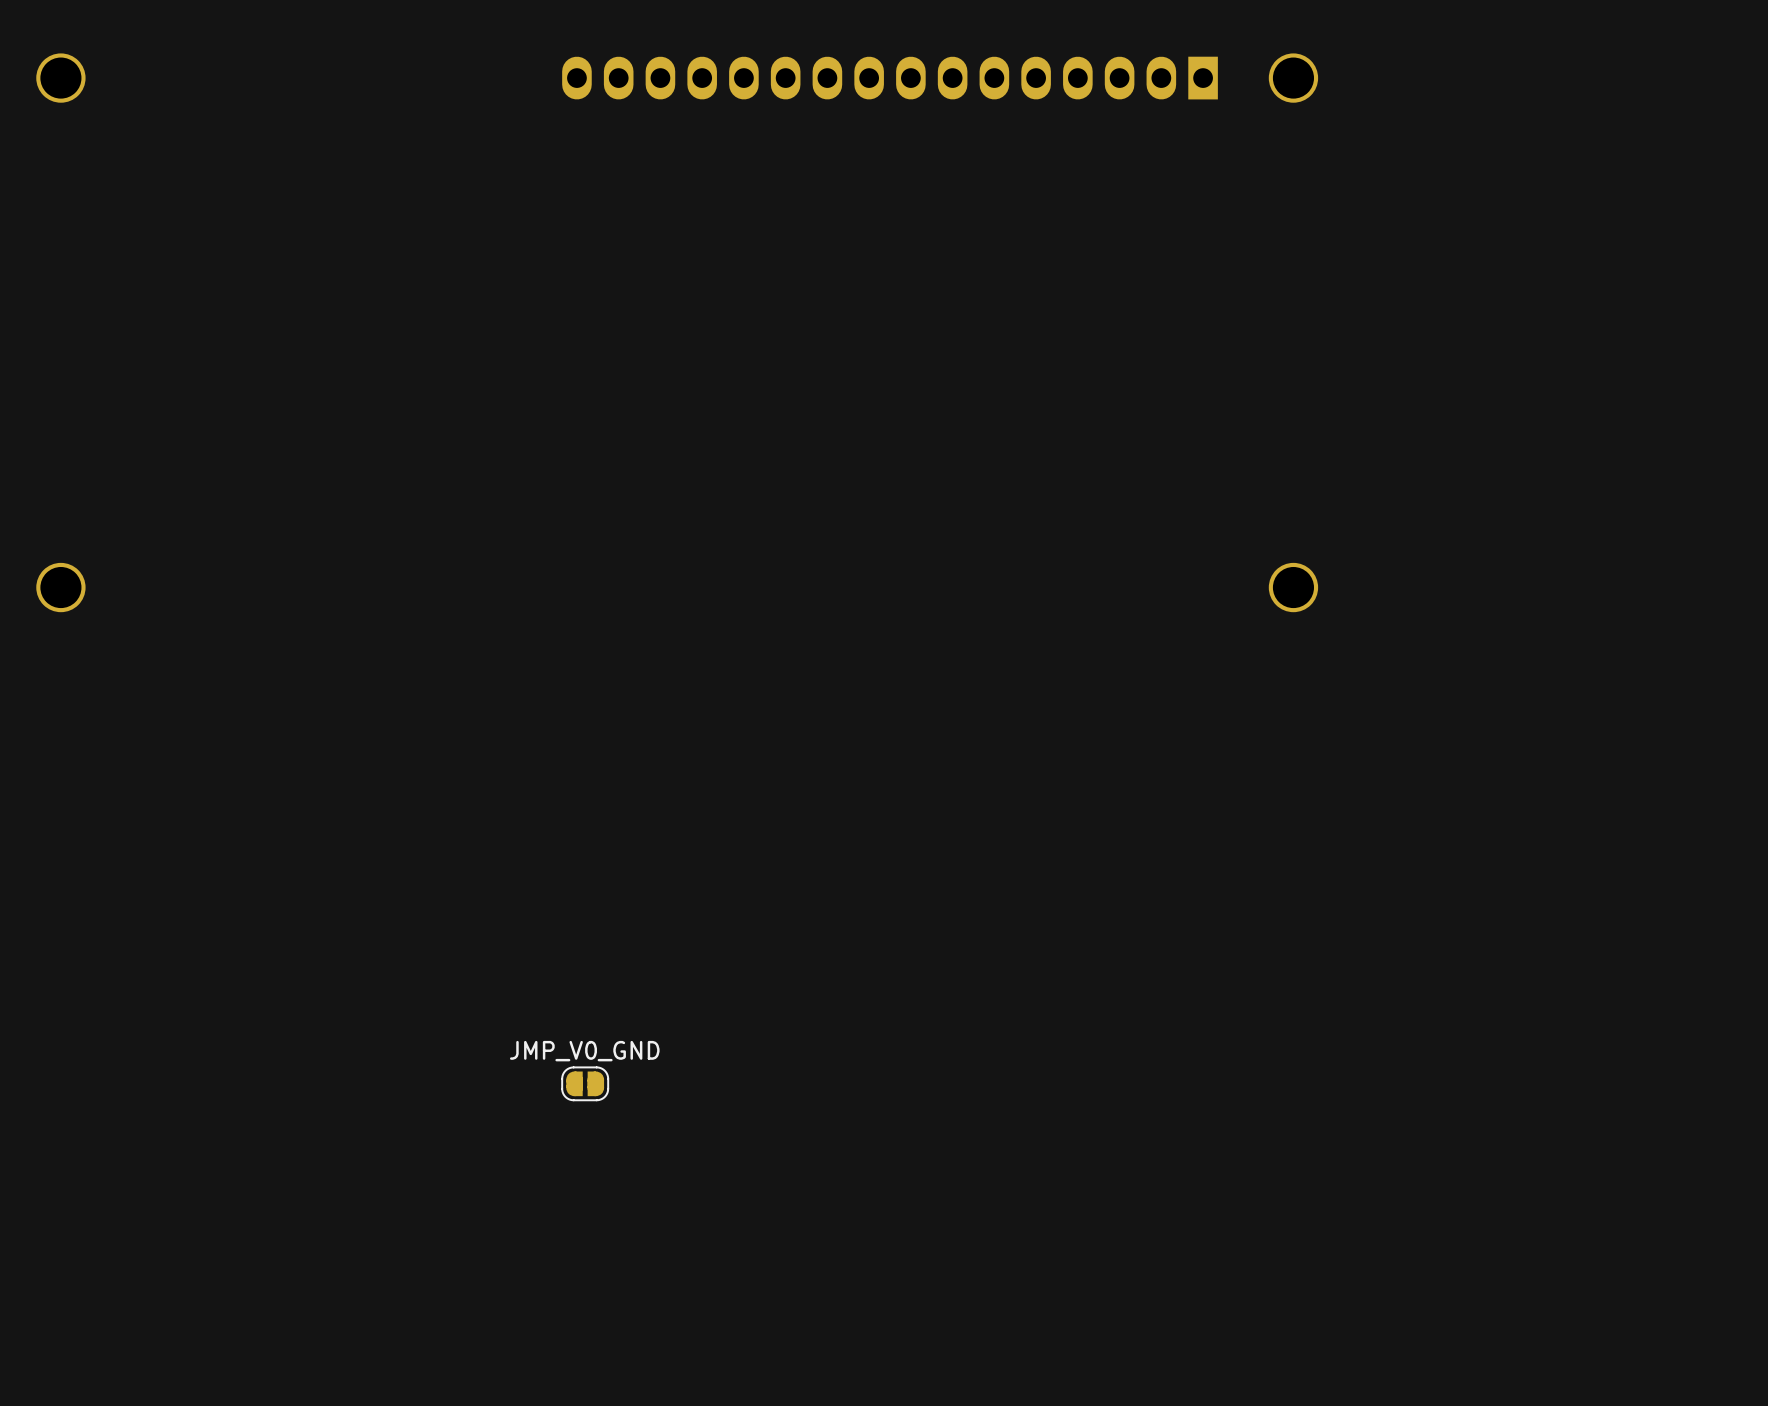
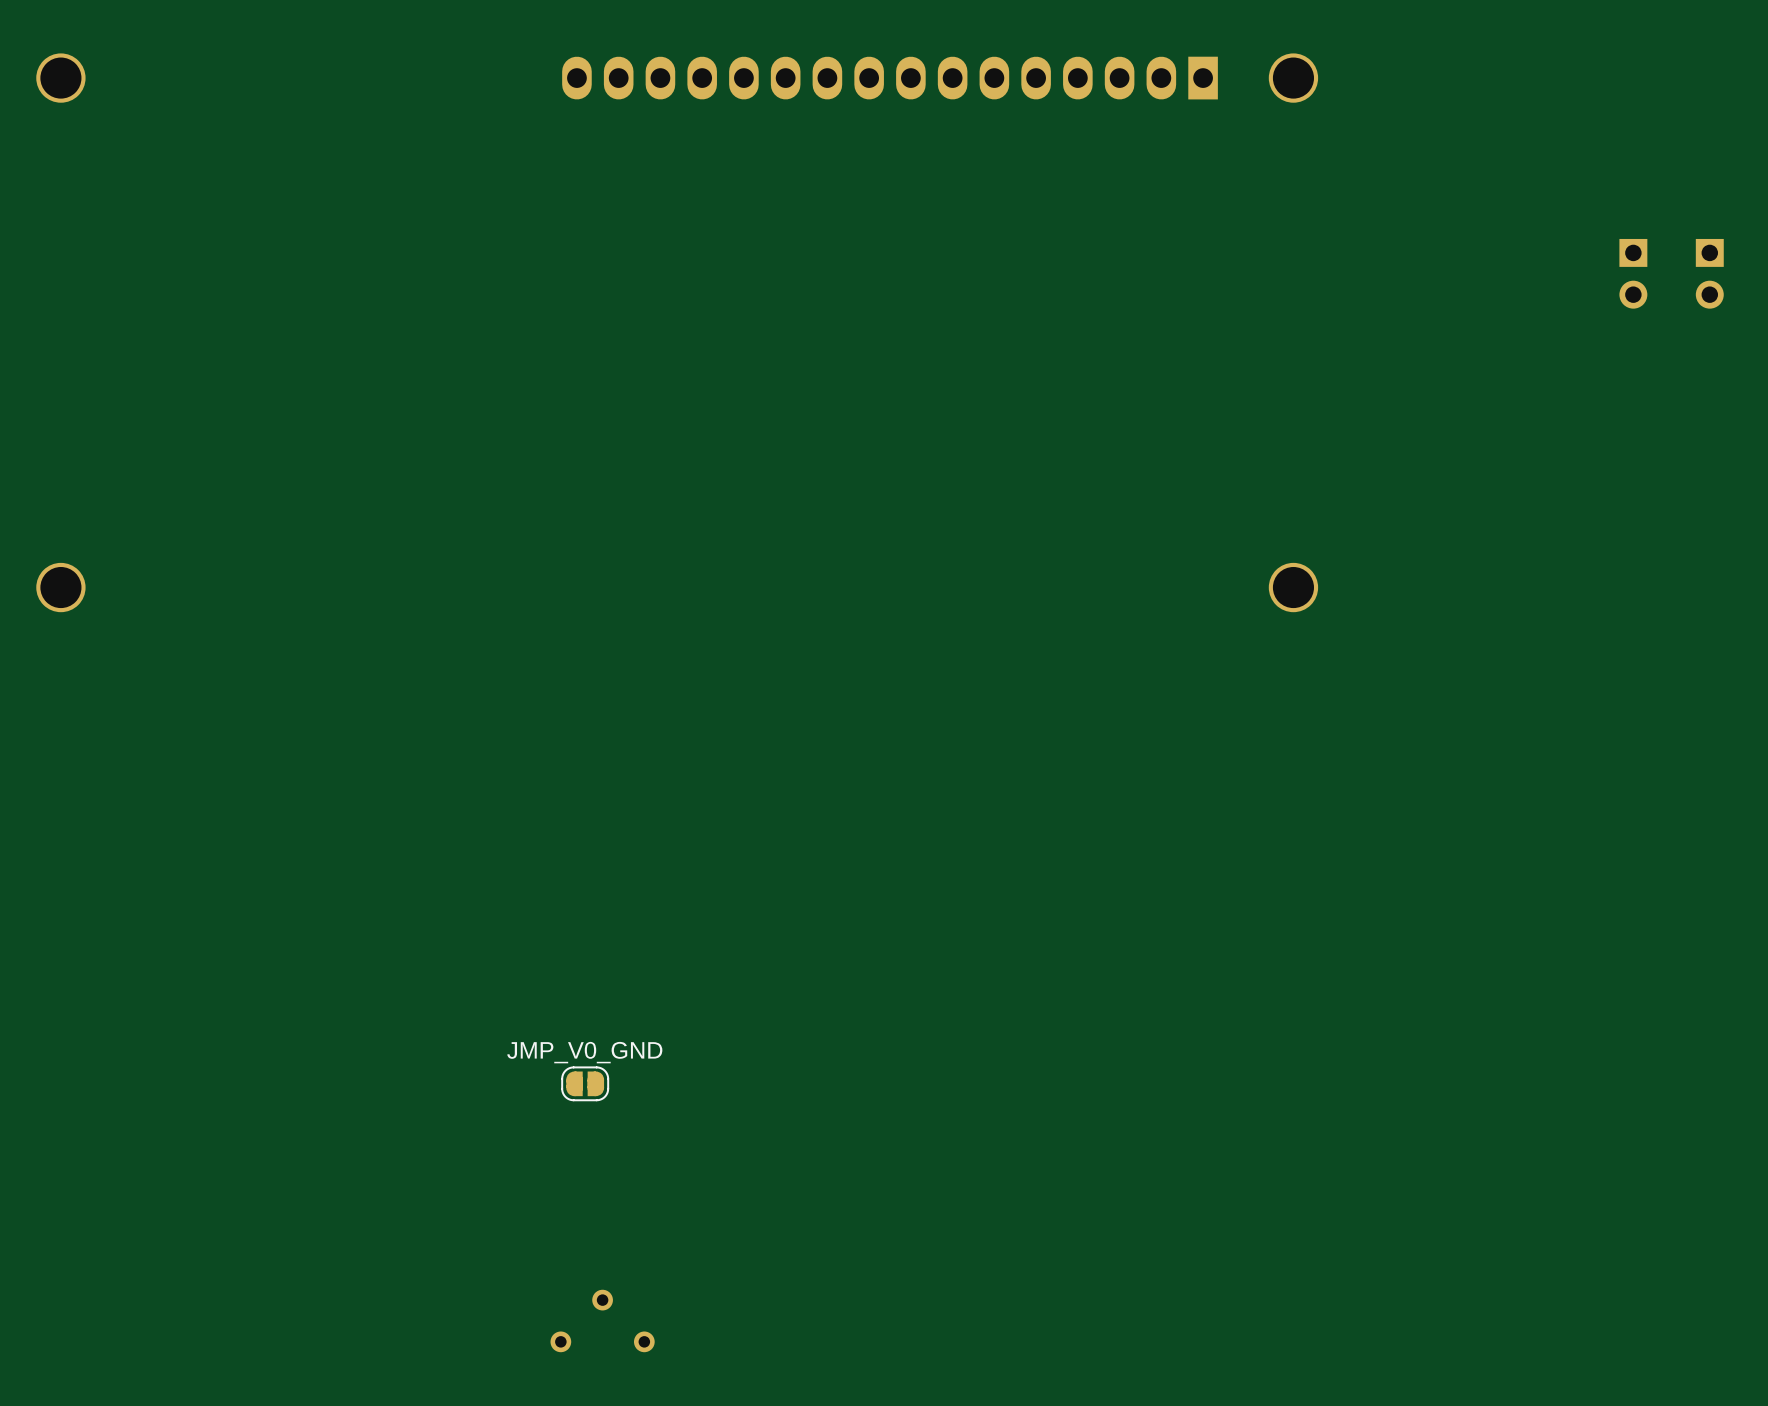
part: none -> (1633, 273)
part: none -> (1709, 273)
part: none -> (602, 1320)

